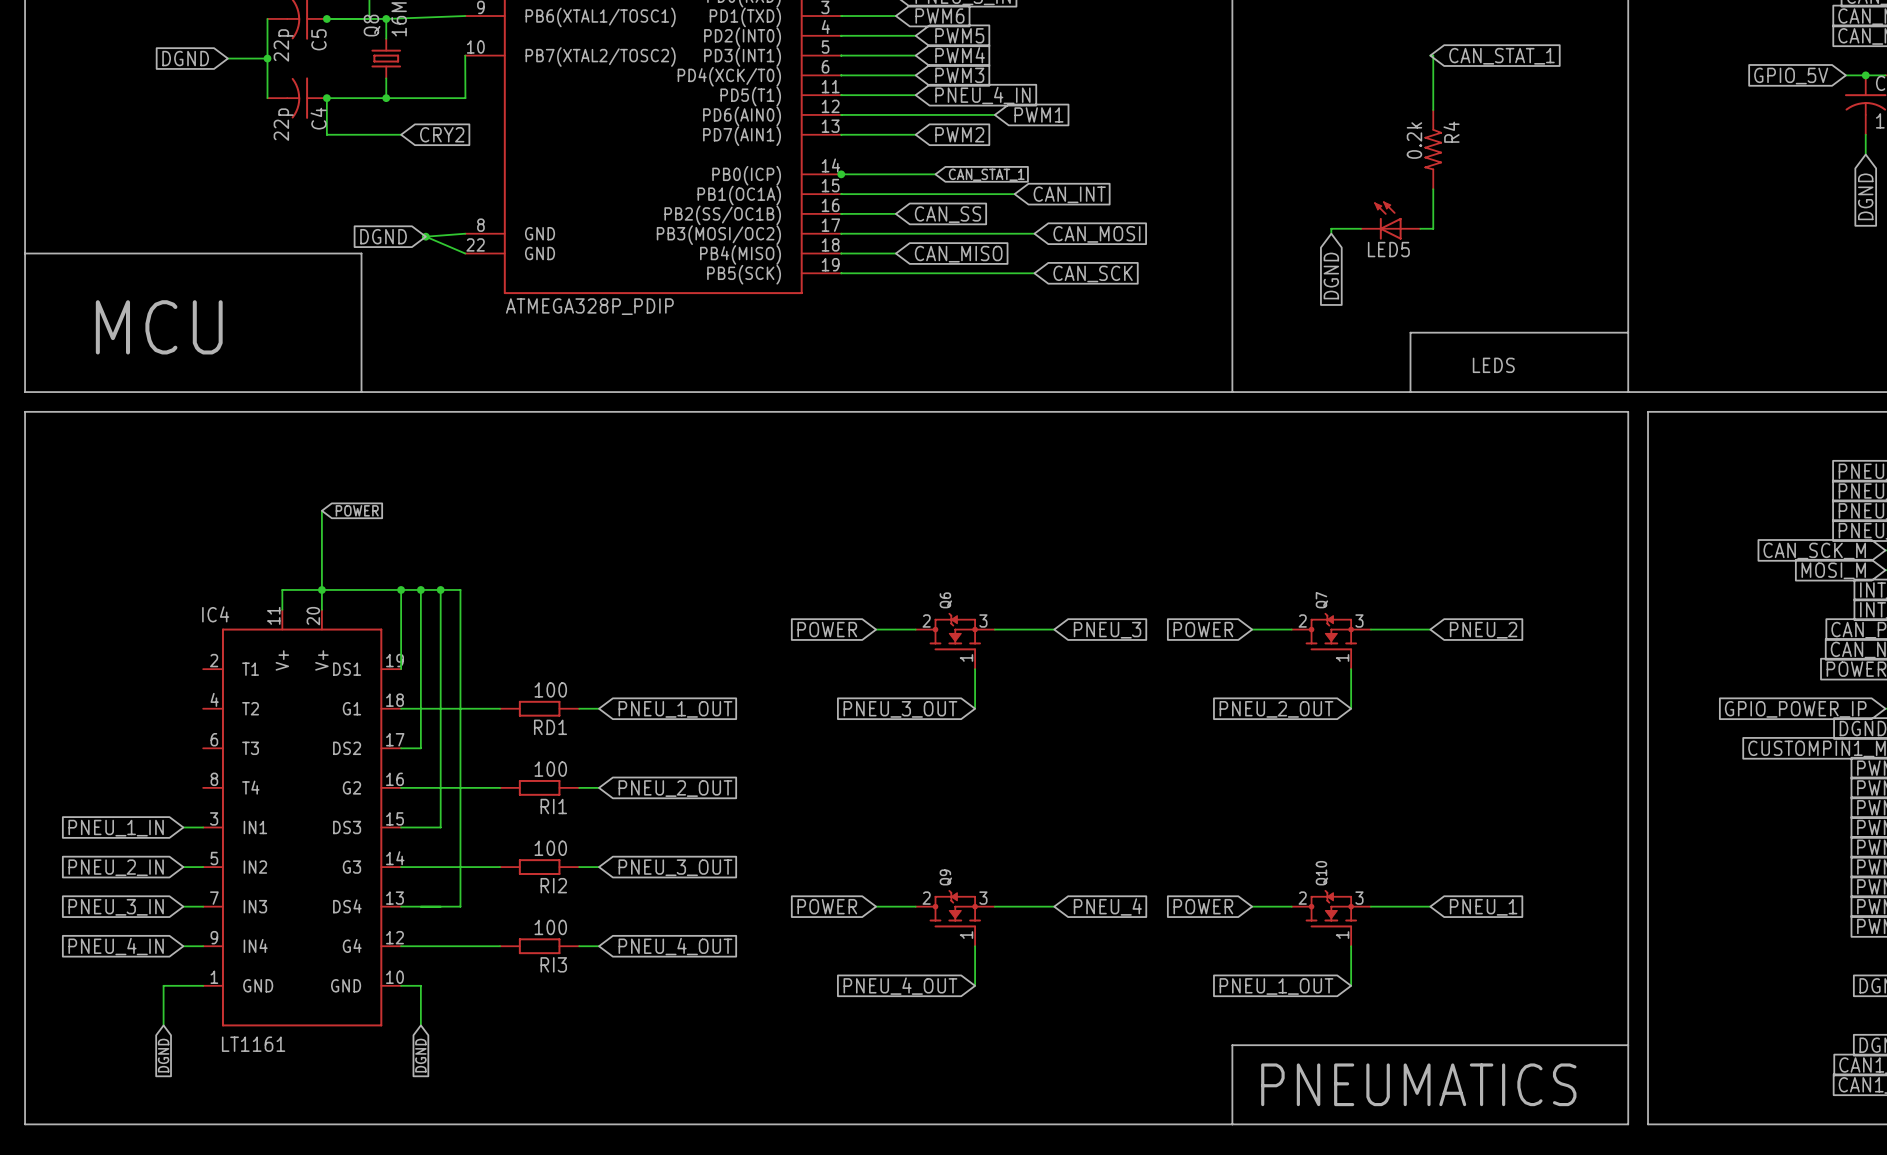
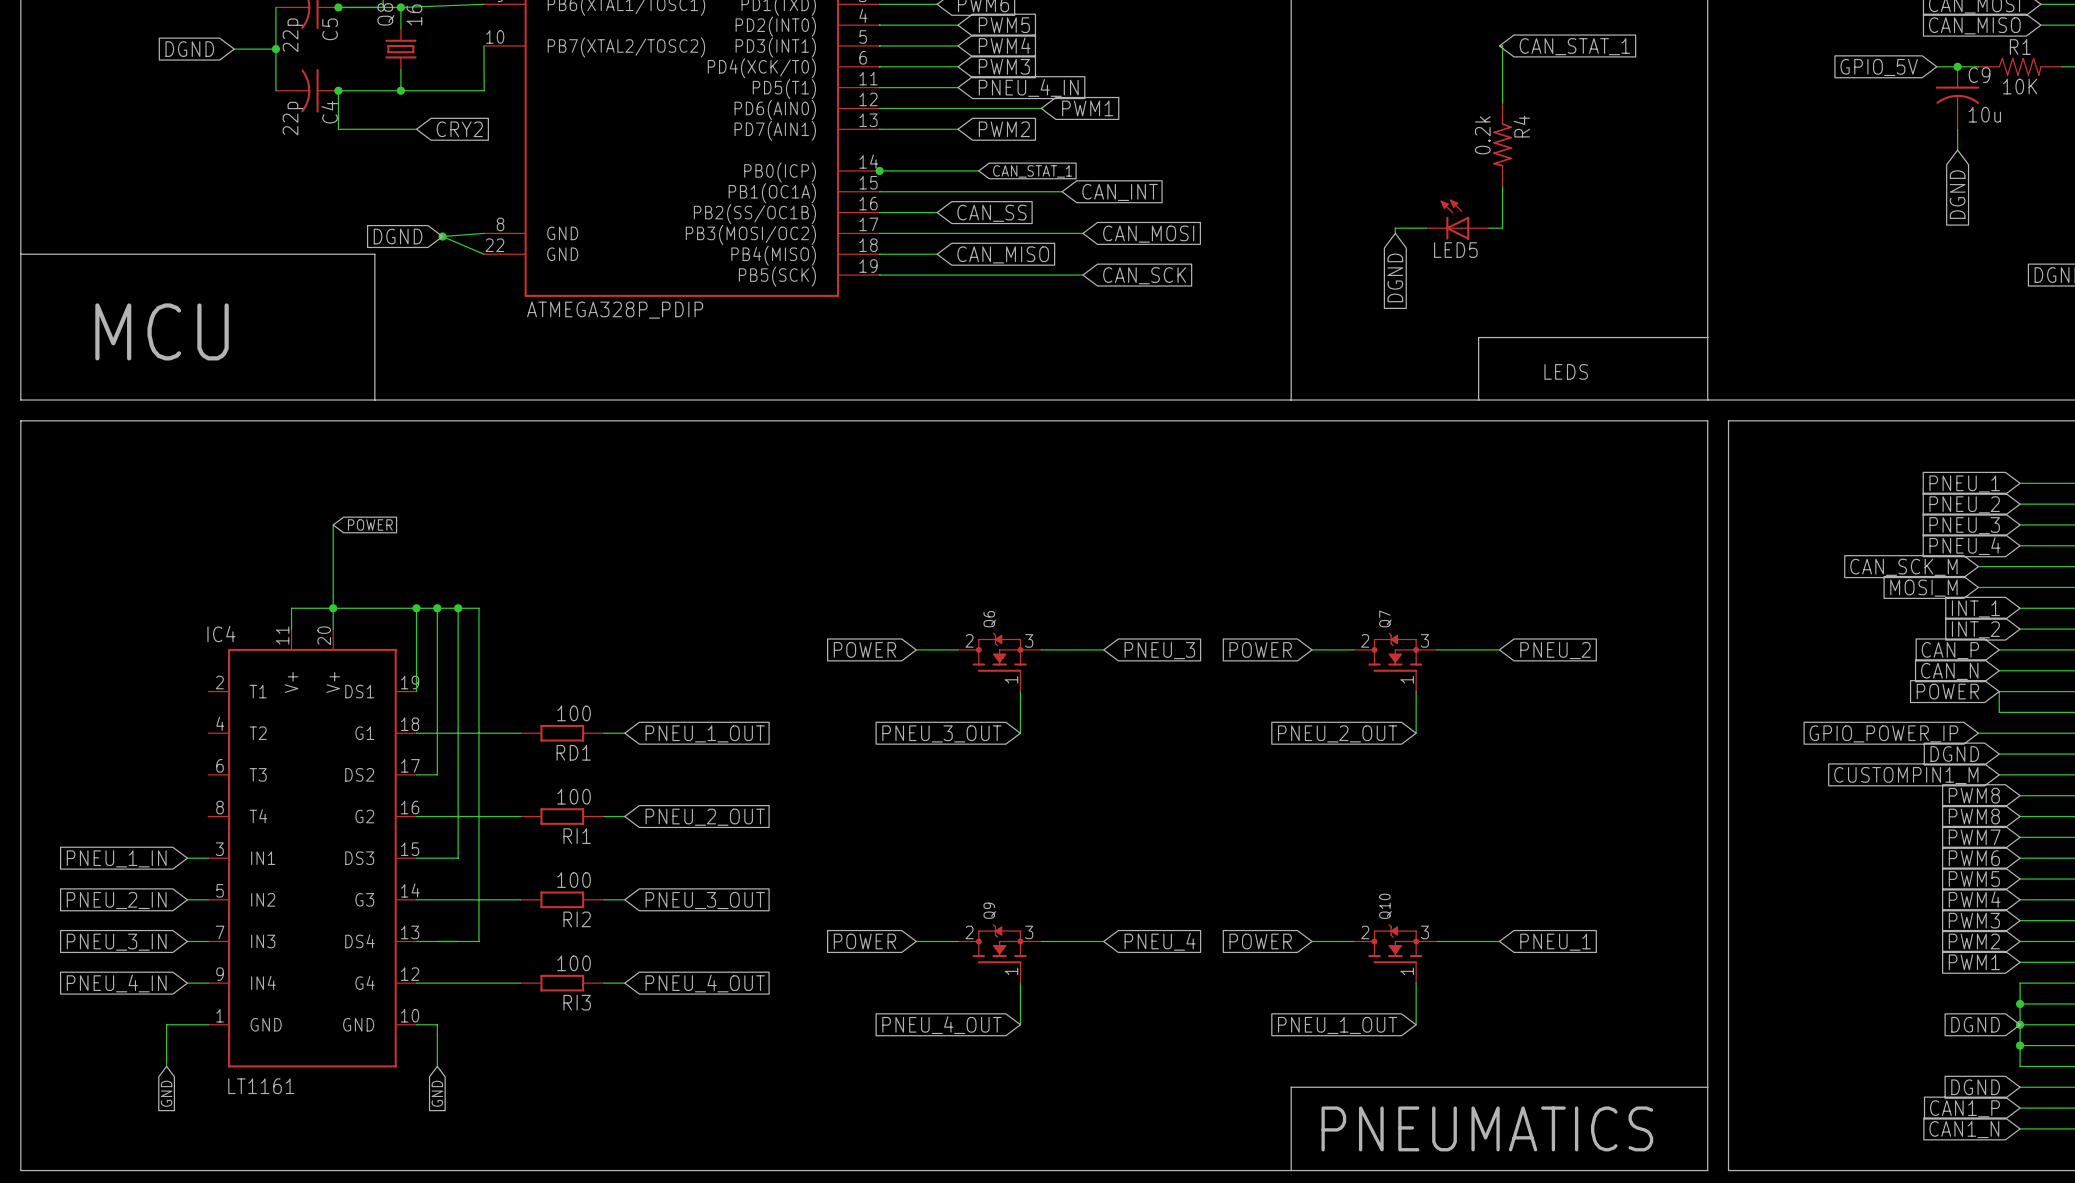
global label: DGND (163, 1055) -> GND (166, 1093)
global label: DGND (420, 1055) -> GND (437, 1093)

